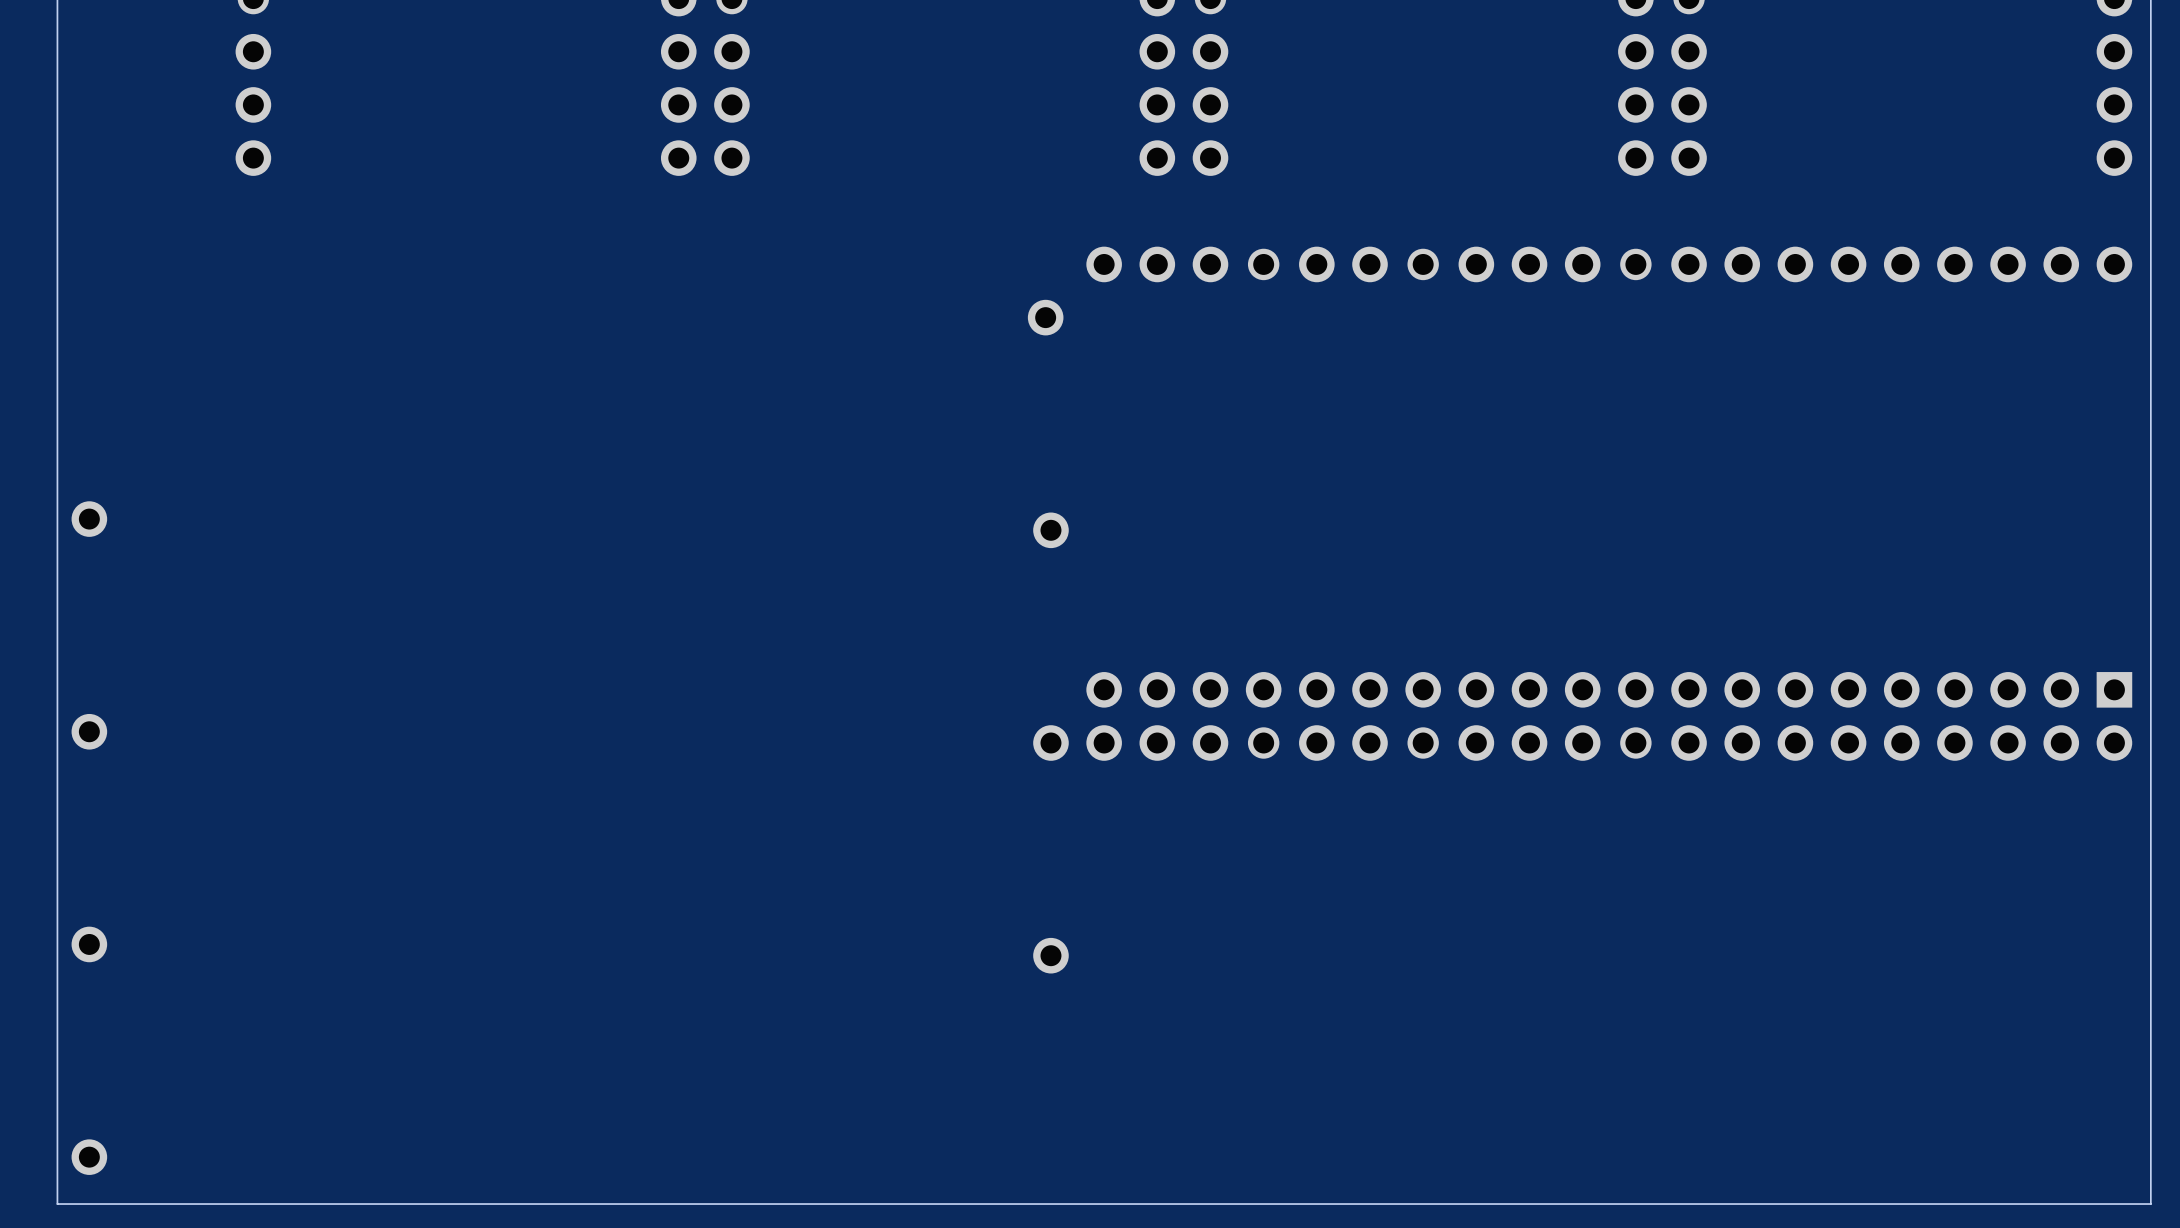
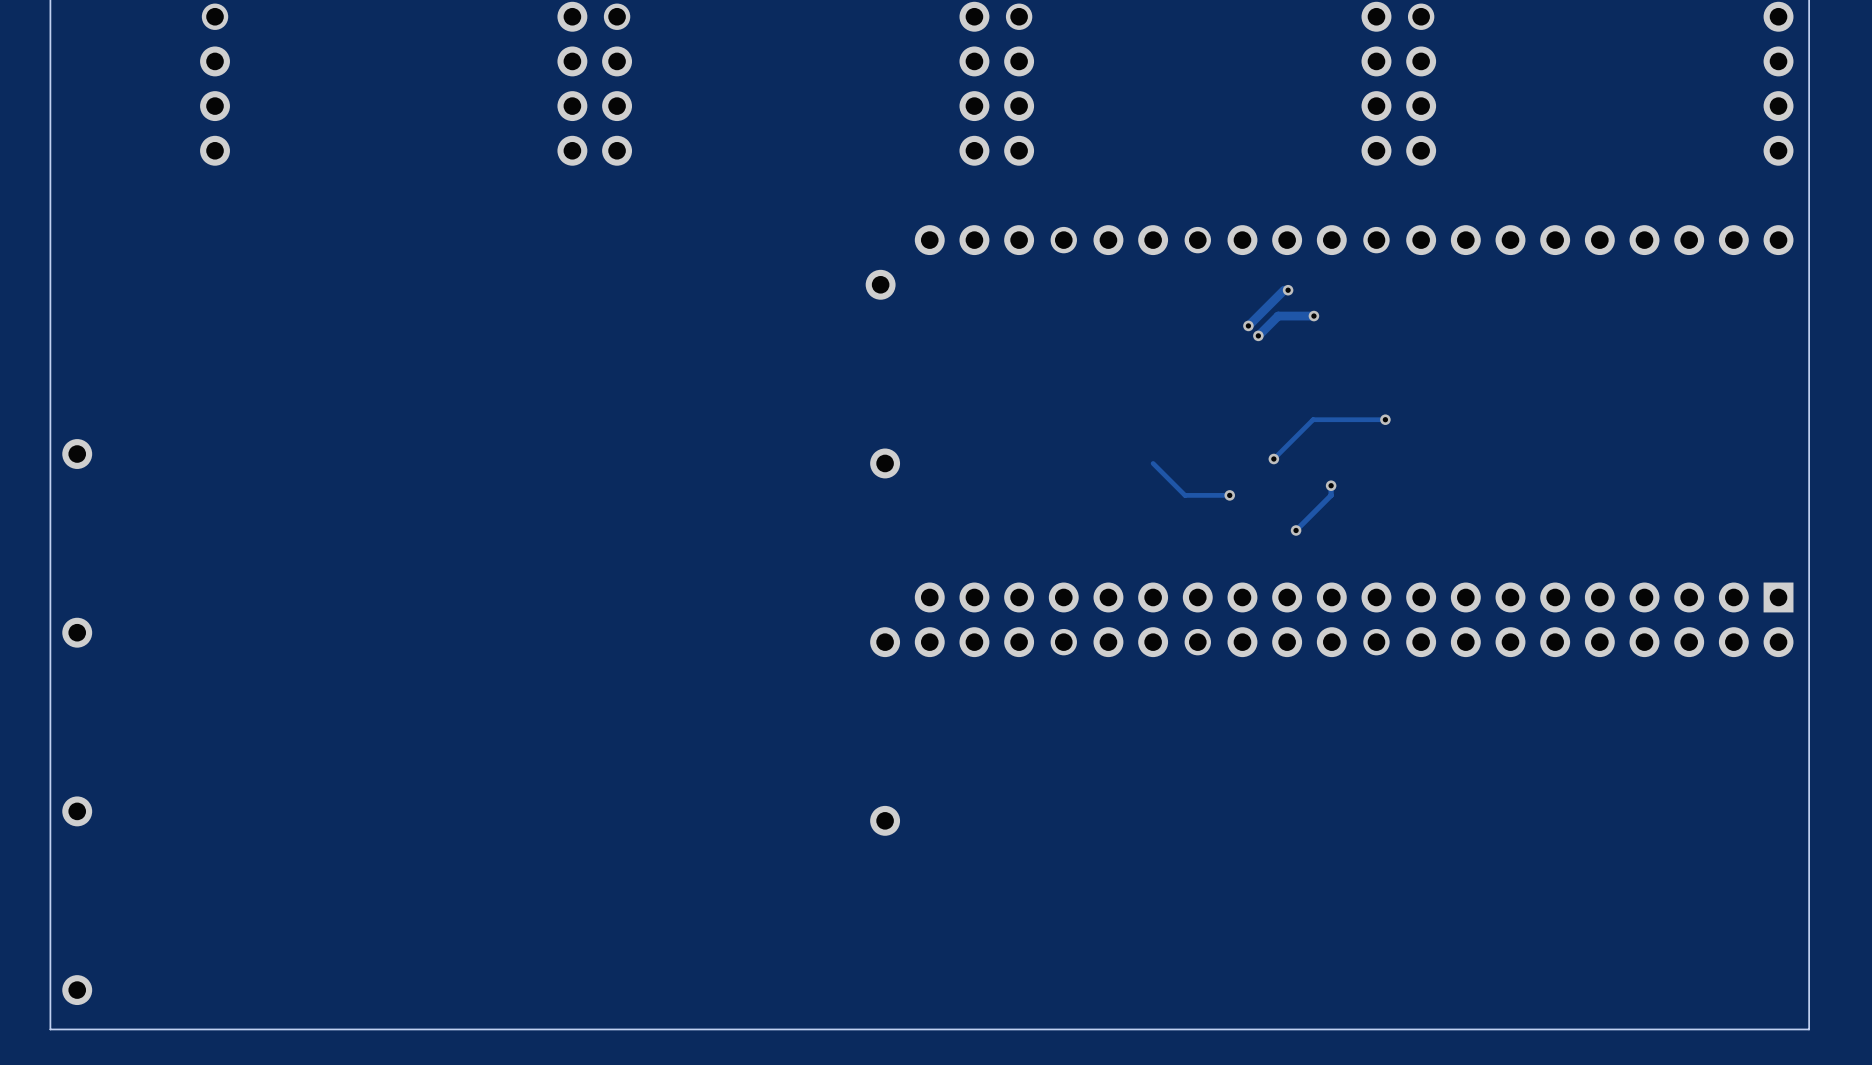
track: none -> (1288, 290) (1284, 290) (1248, 325)
via: none -> (1288, 290)
track: none -> (1313, 316) (1278, 316) (1258, 335)
via: none -> (1313, 316)
via: none -> (1248, 325)
via: none -> (1258, 335)
track: none -> (1385, 419) (1313, 419) (1273, 459)
via: none -> (1385, 419)
via: none -> (1273, 459)
track: none -> (1153, 463) (1185, 495) (1229, 495)
track: none -> (1331, 485) (1331, 495) (1296, 530)
via: none -> (1331, 485)
via: none -> (1229, 495)
via: none -> (1296, 530)

